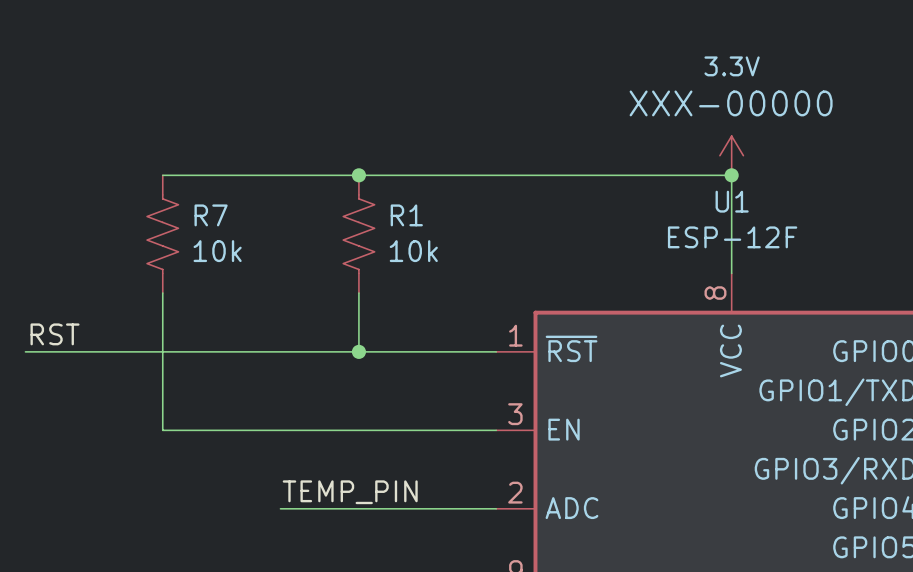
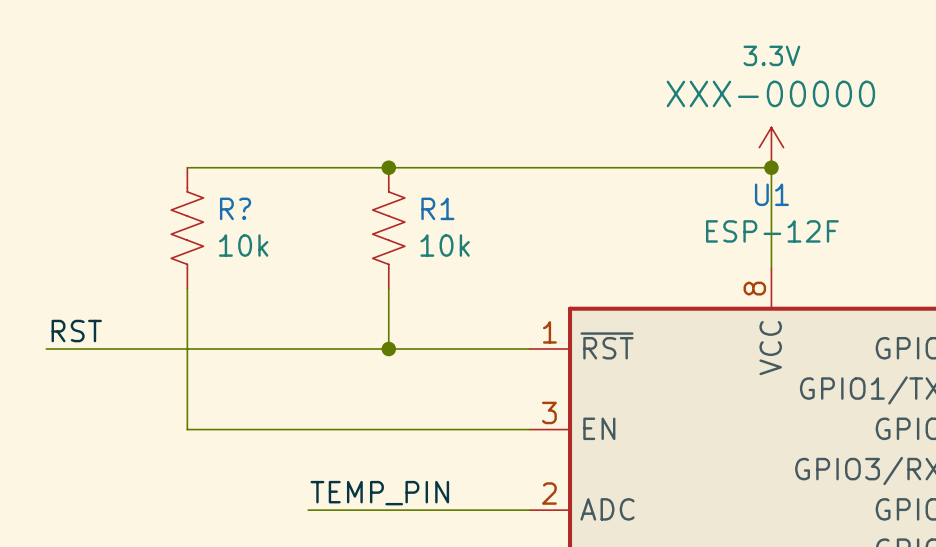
R7 name: R7 (211, 215) -> R? (235, 208)

